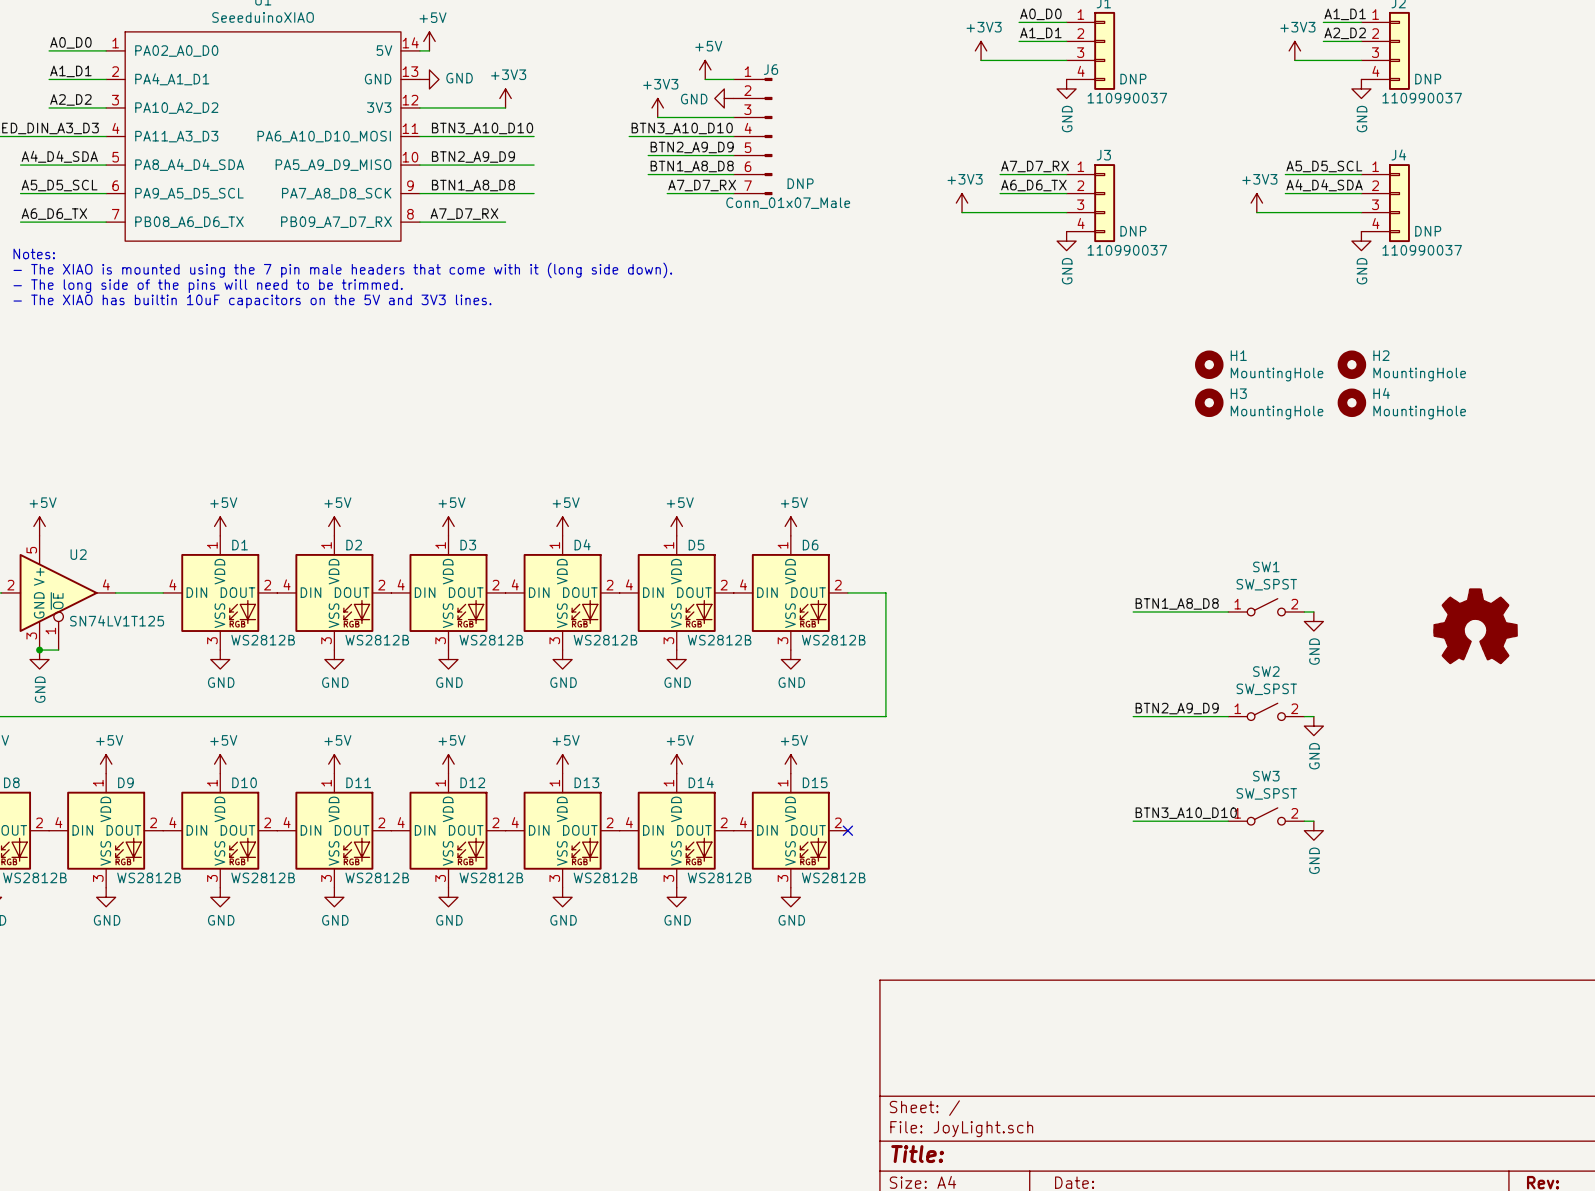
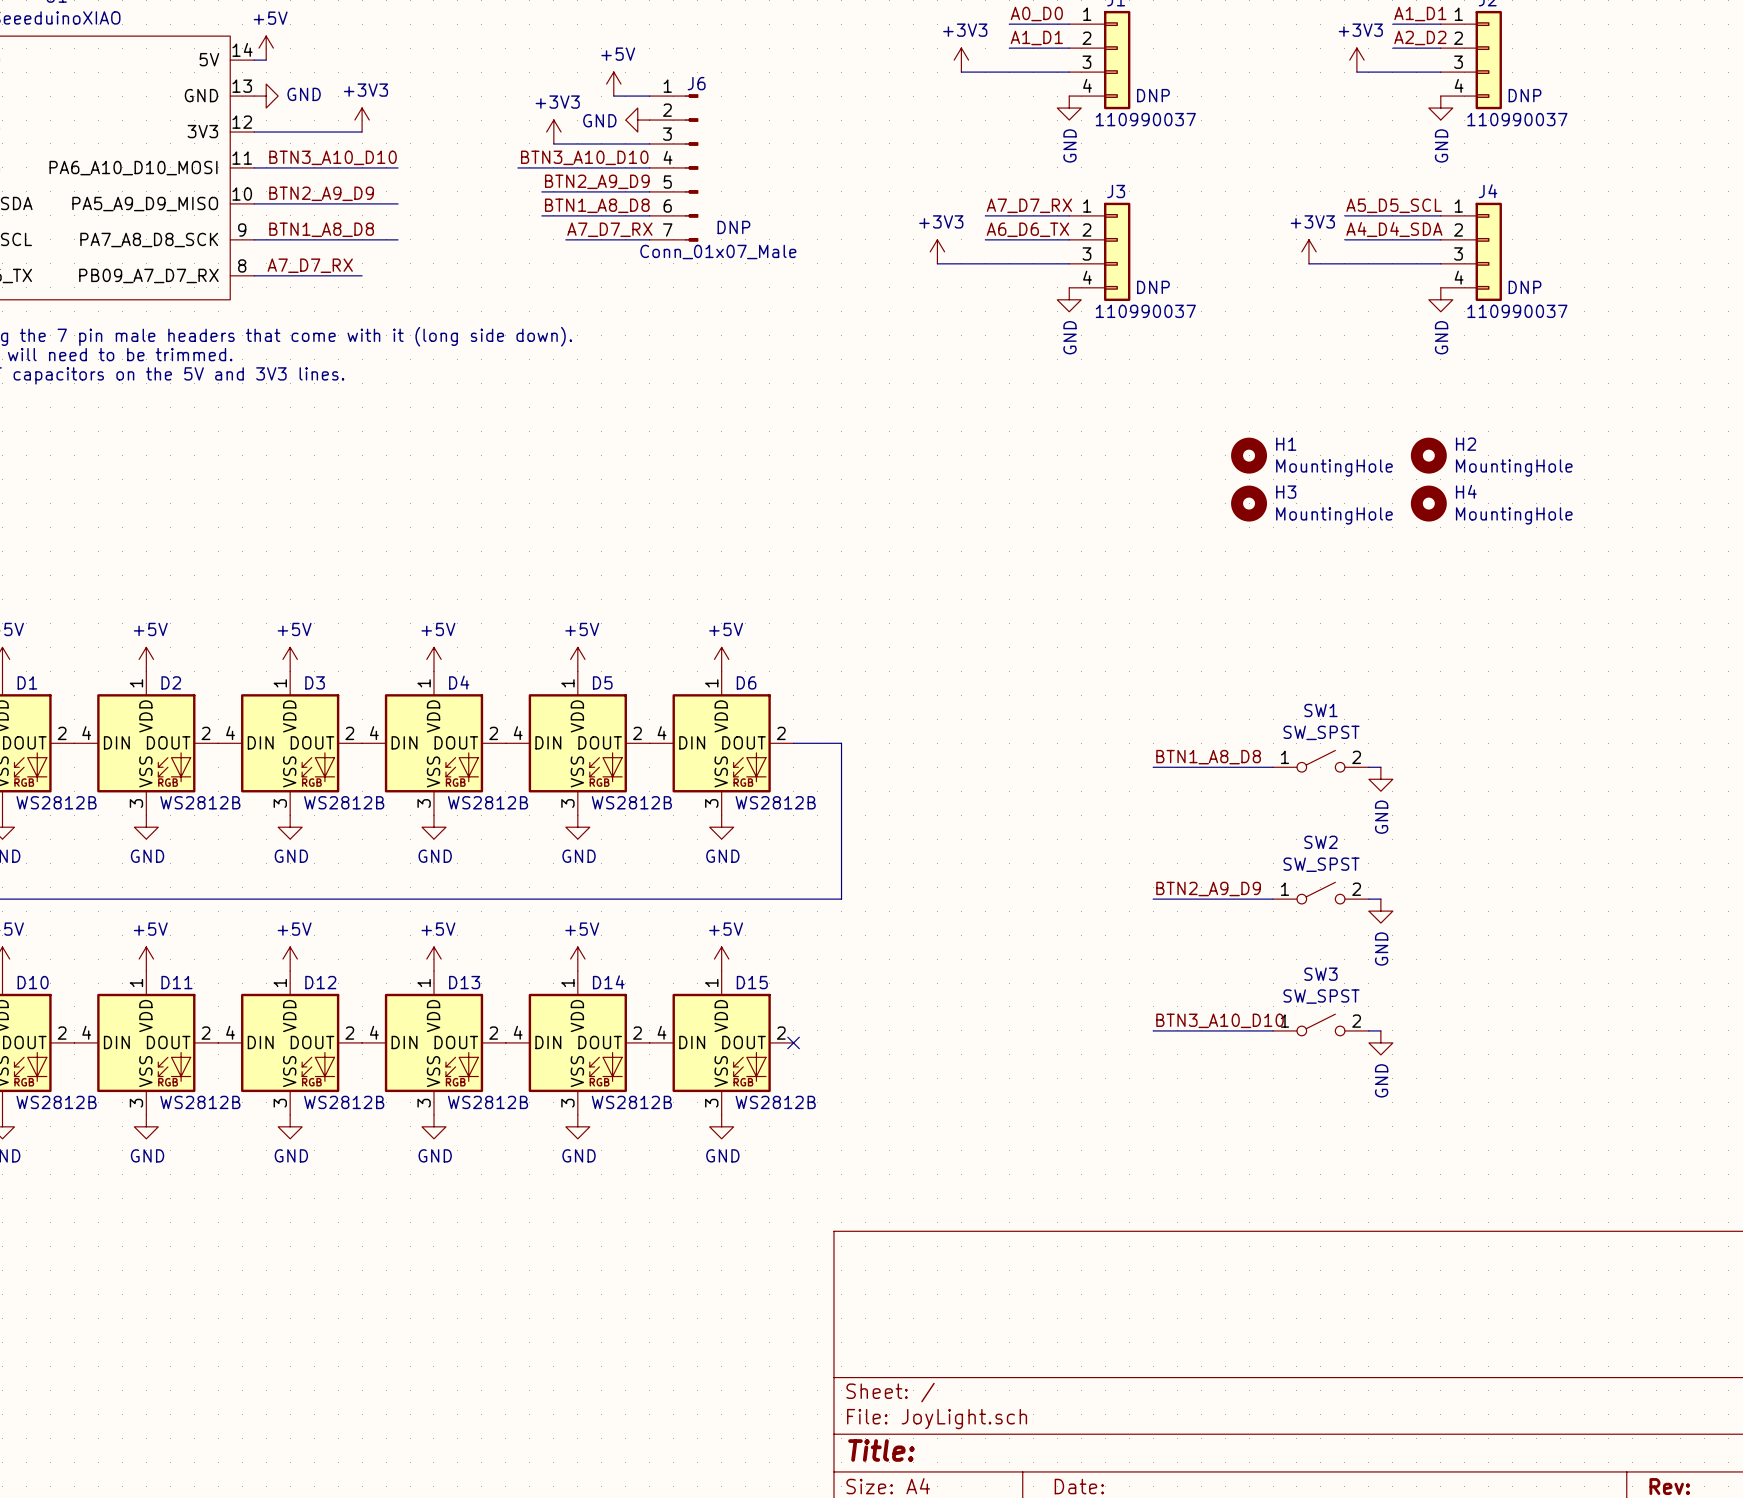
power symbol: (1475, 626) -> none

